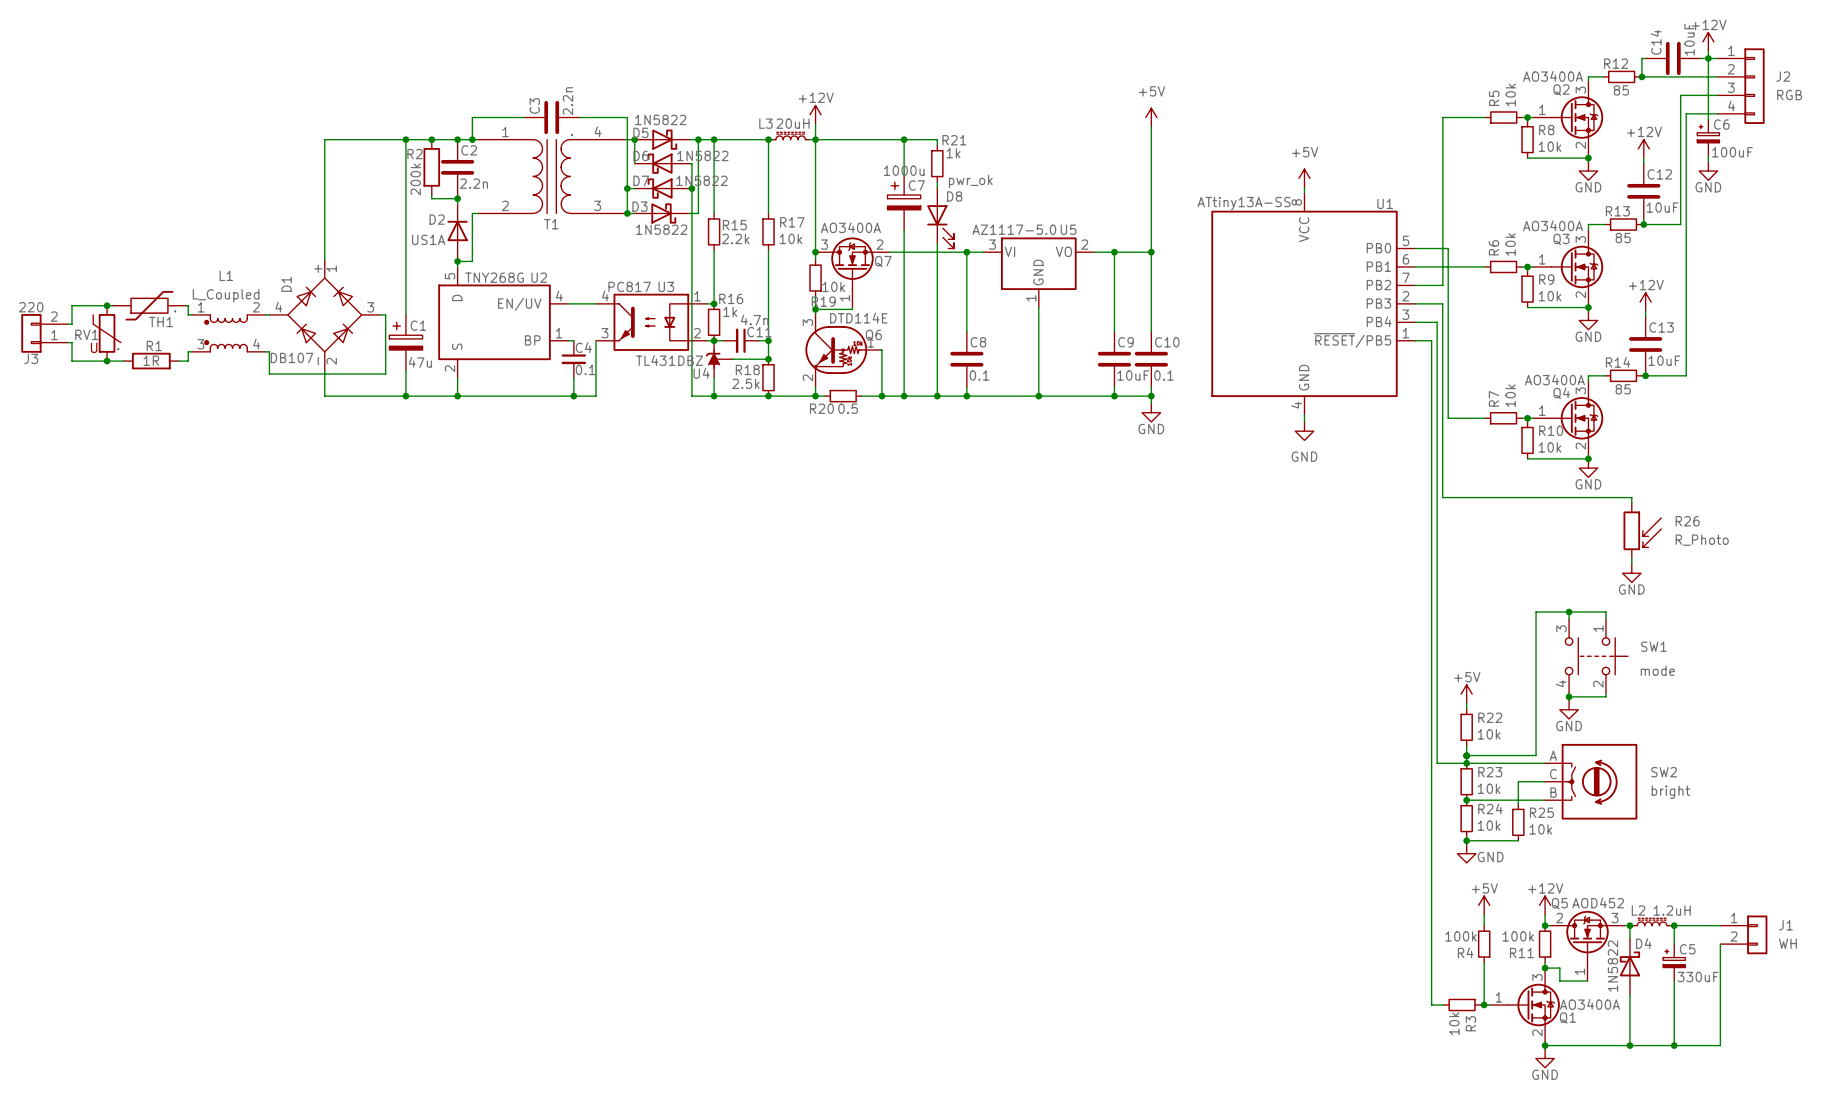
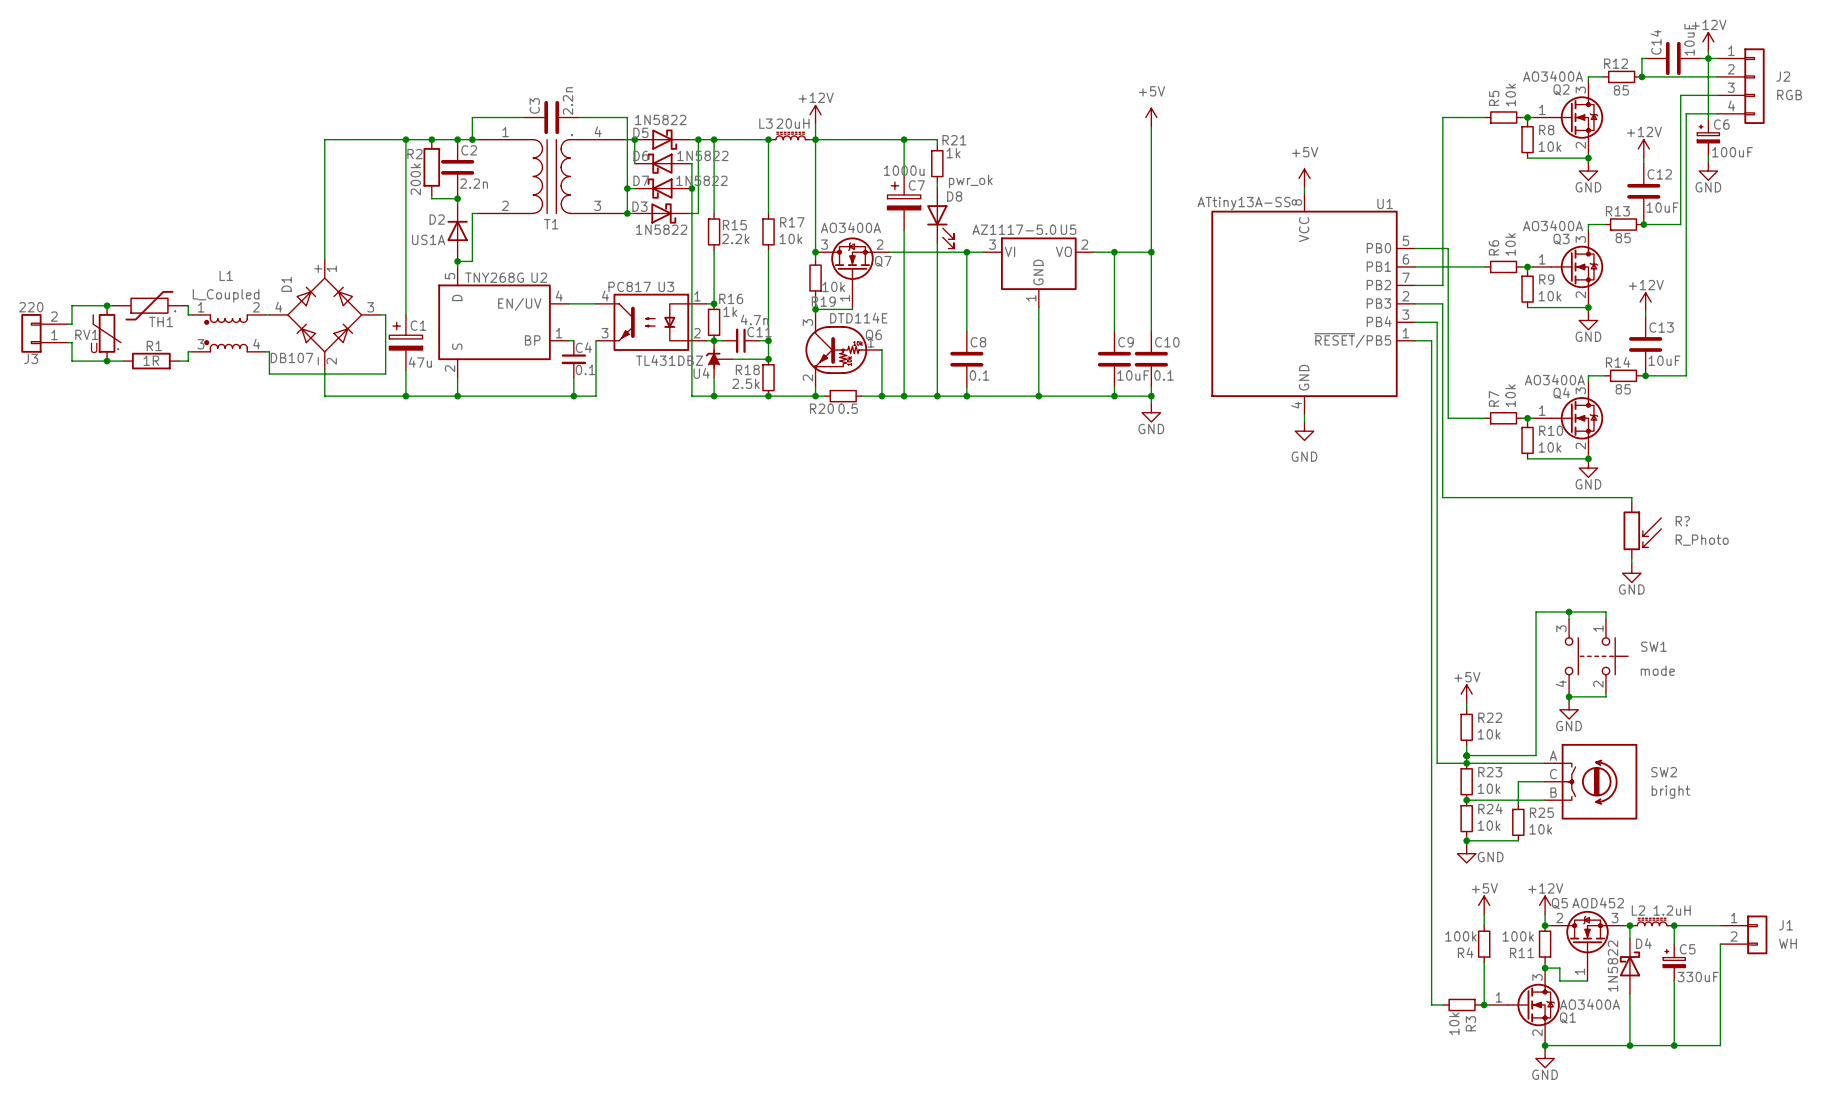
R26 name: R26 (1687, 521) -> R? (1682, 521)

